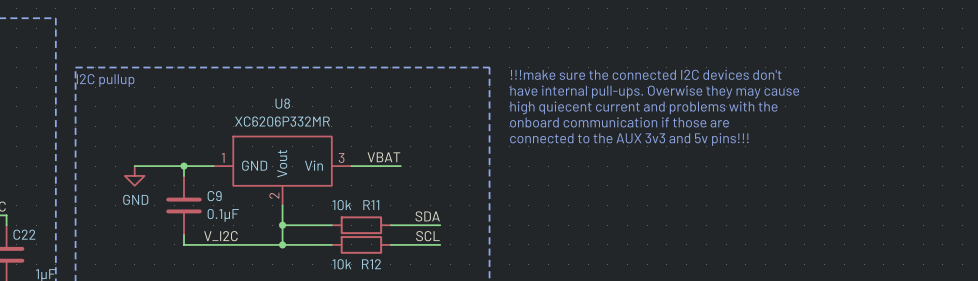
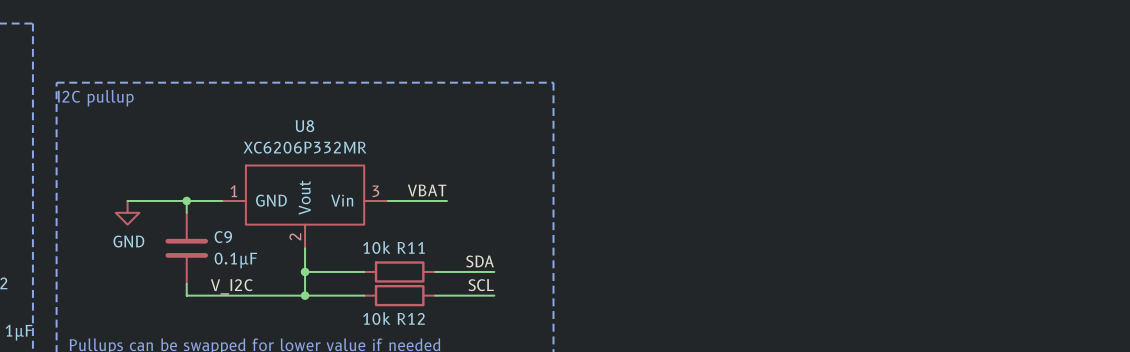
text: !!!make sure the connected I2C devices don't (646, 74) -> none
text: have internal pull-ups. Overwise they may cause (654, 92) -> none
text: high quiecent current and problems with the (643, 107) -> none
text: onboard communication if those are (619, 122) -> none
text: connected to the AUX 3v3 and 5v pins!!! (629, 139) -> none

